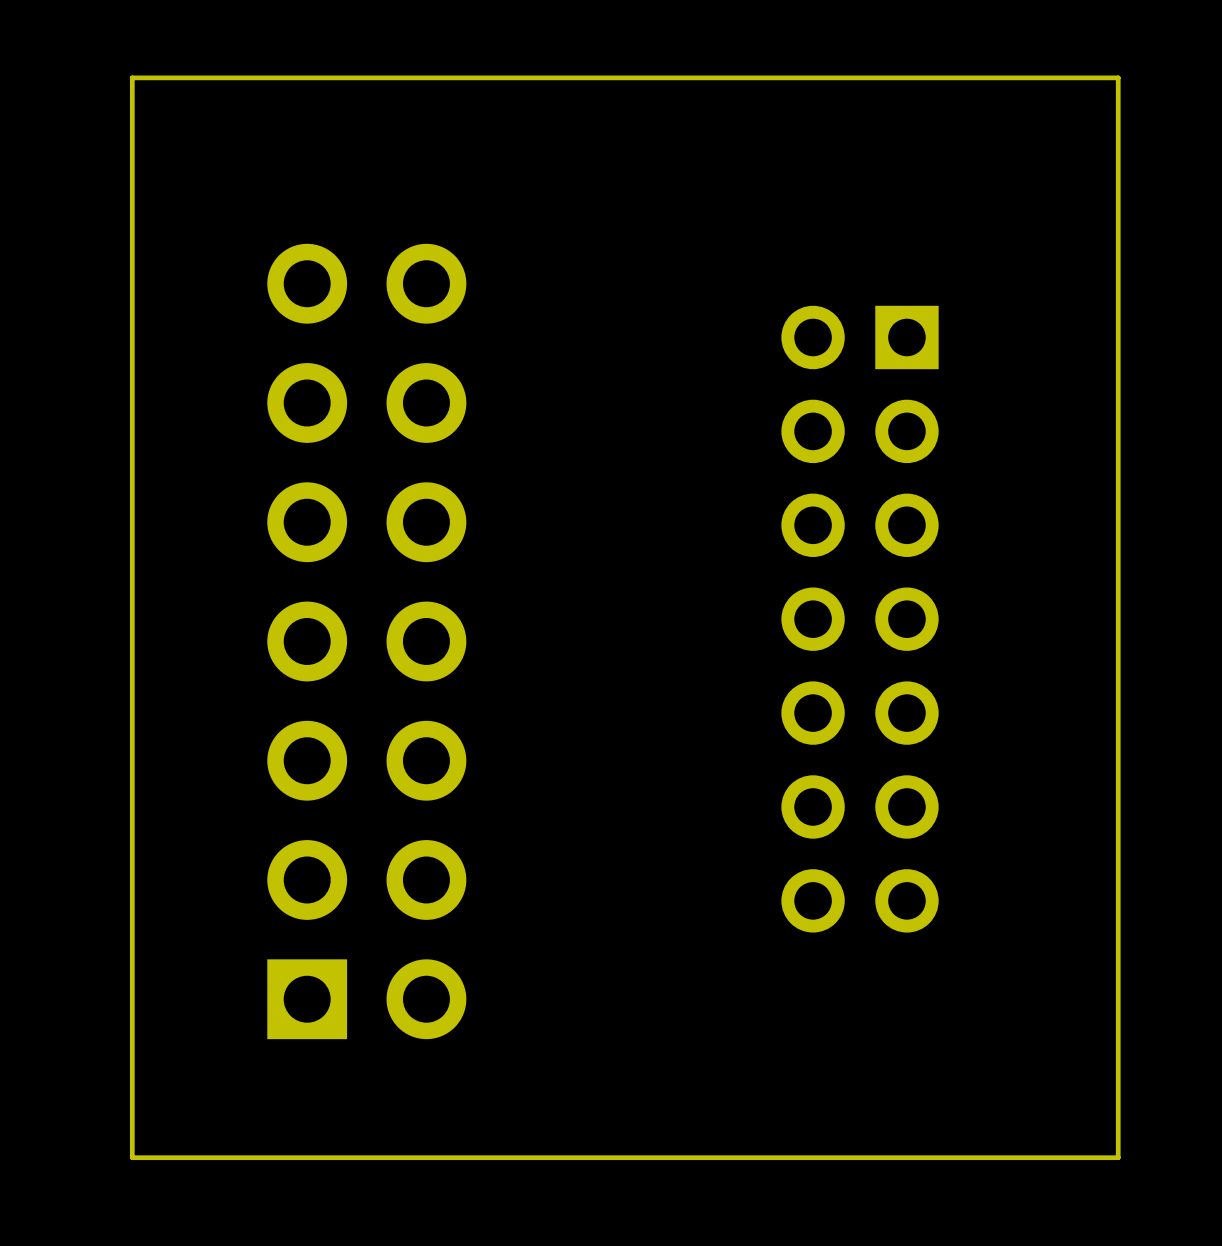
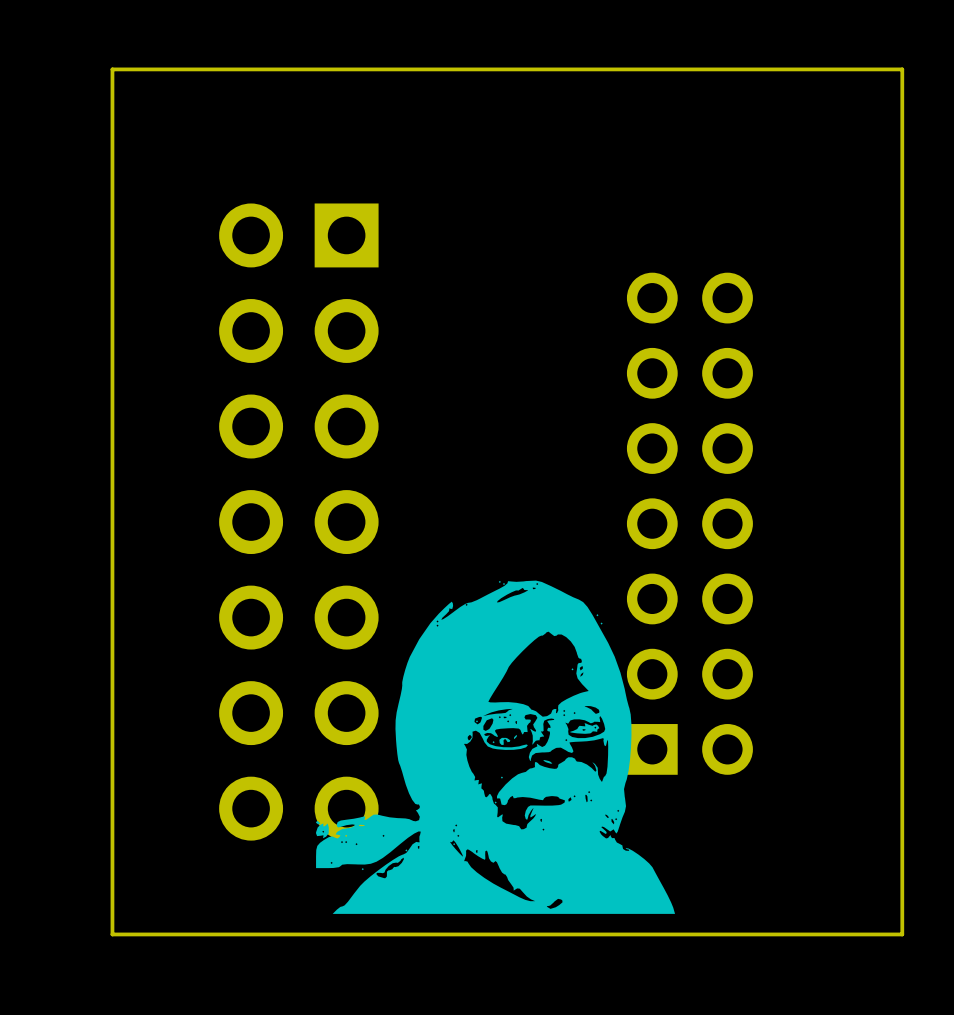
part rotation: 0° (860, 619) -> 180° (689, 523)
part rotation: 0° (366, 641) -> 180° (298, 522)
drawing: none -> [316, 580, 676, 914]

